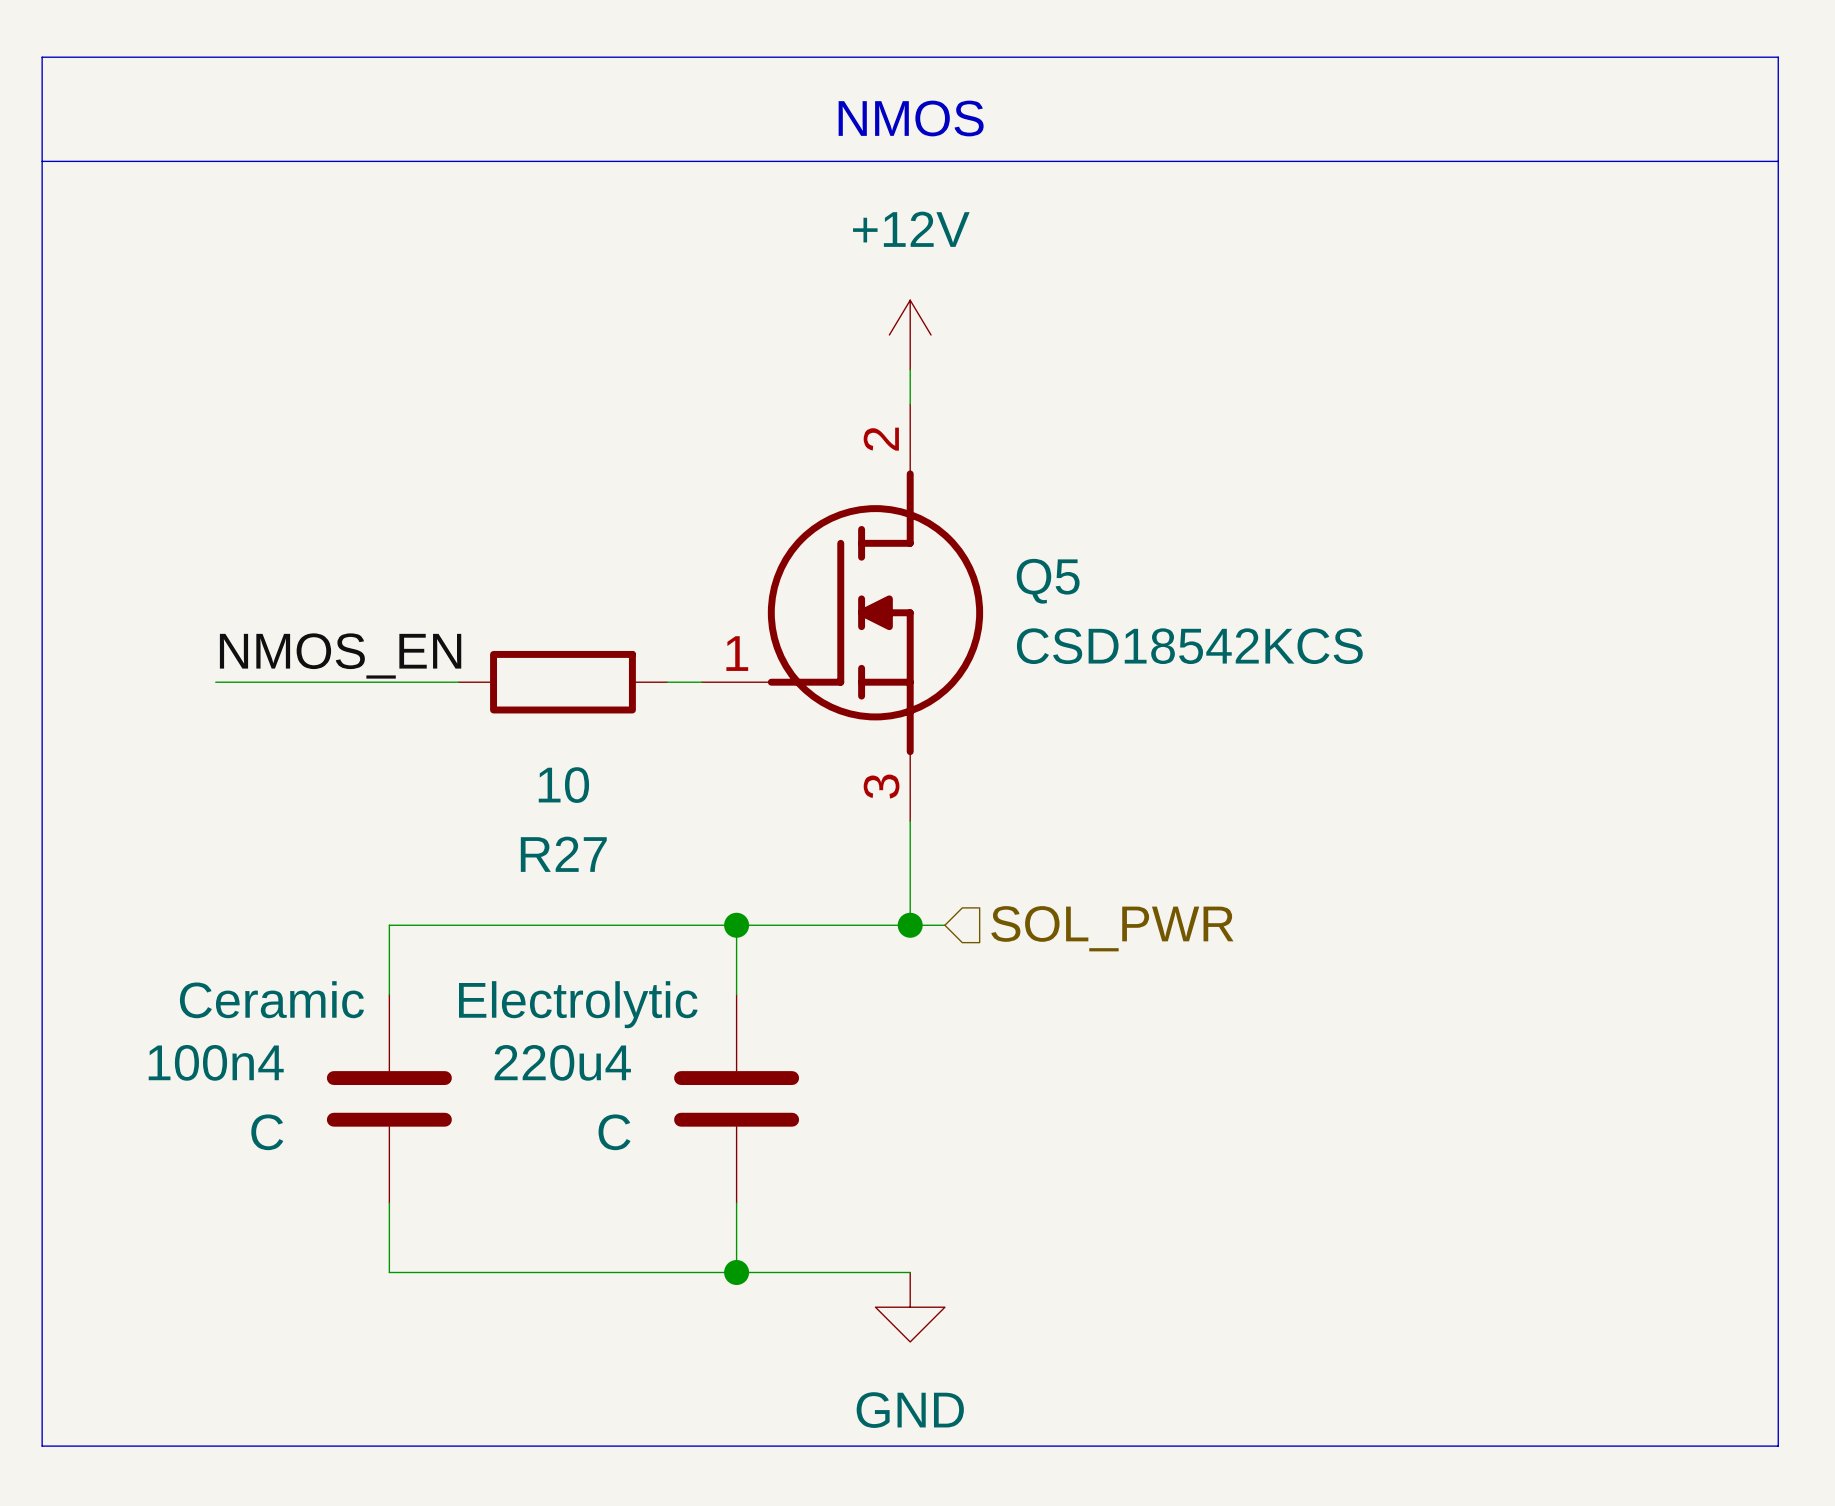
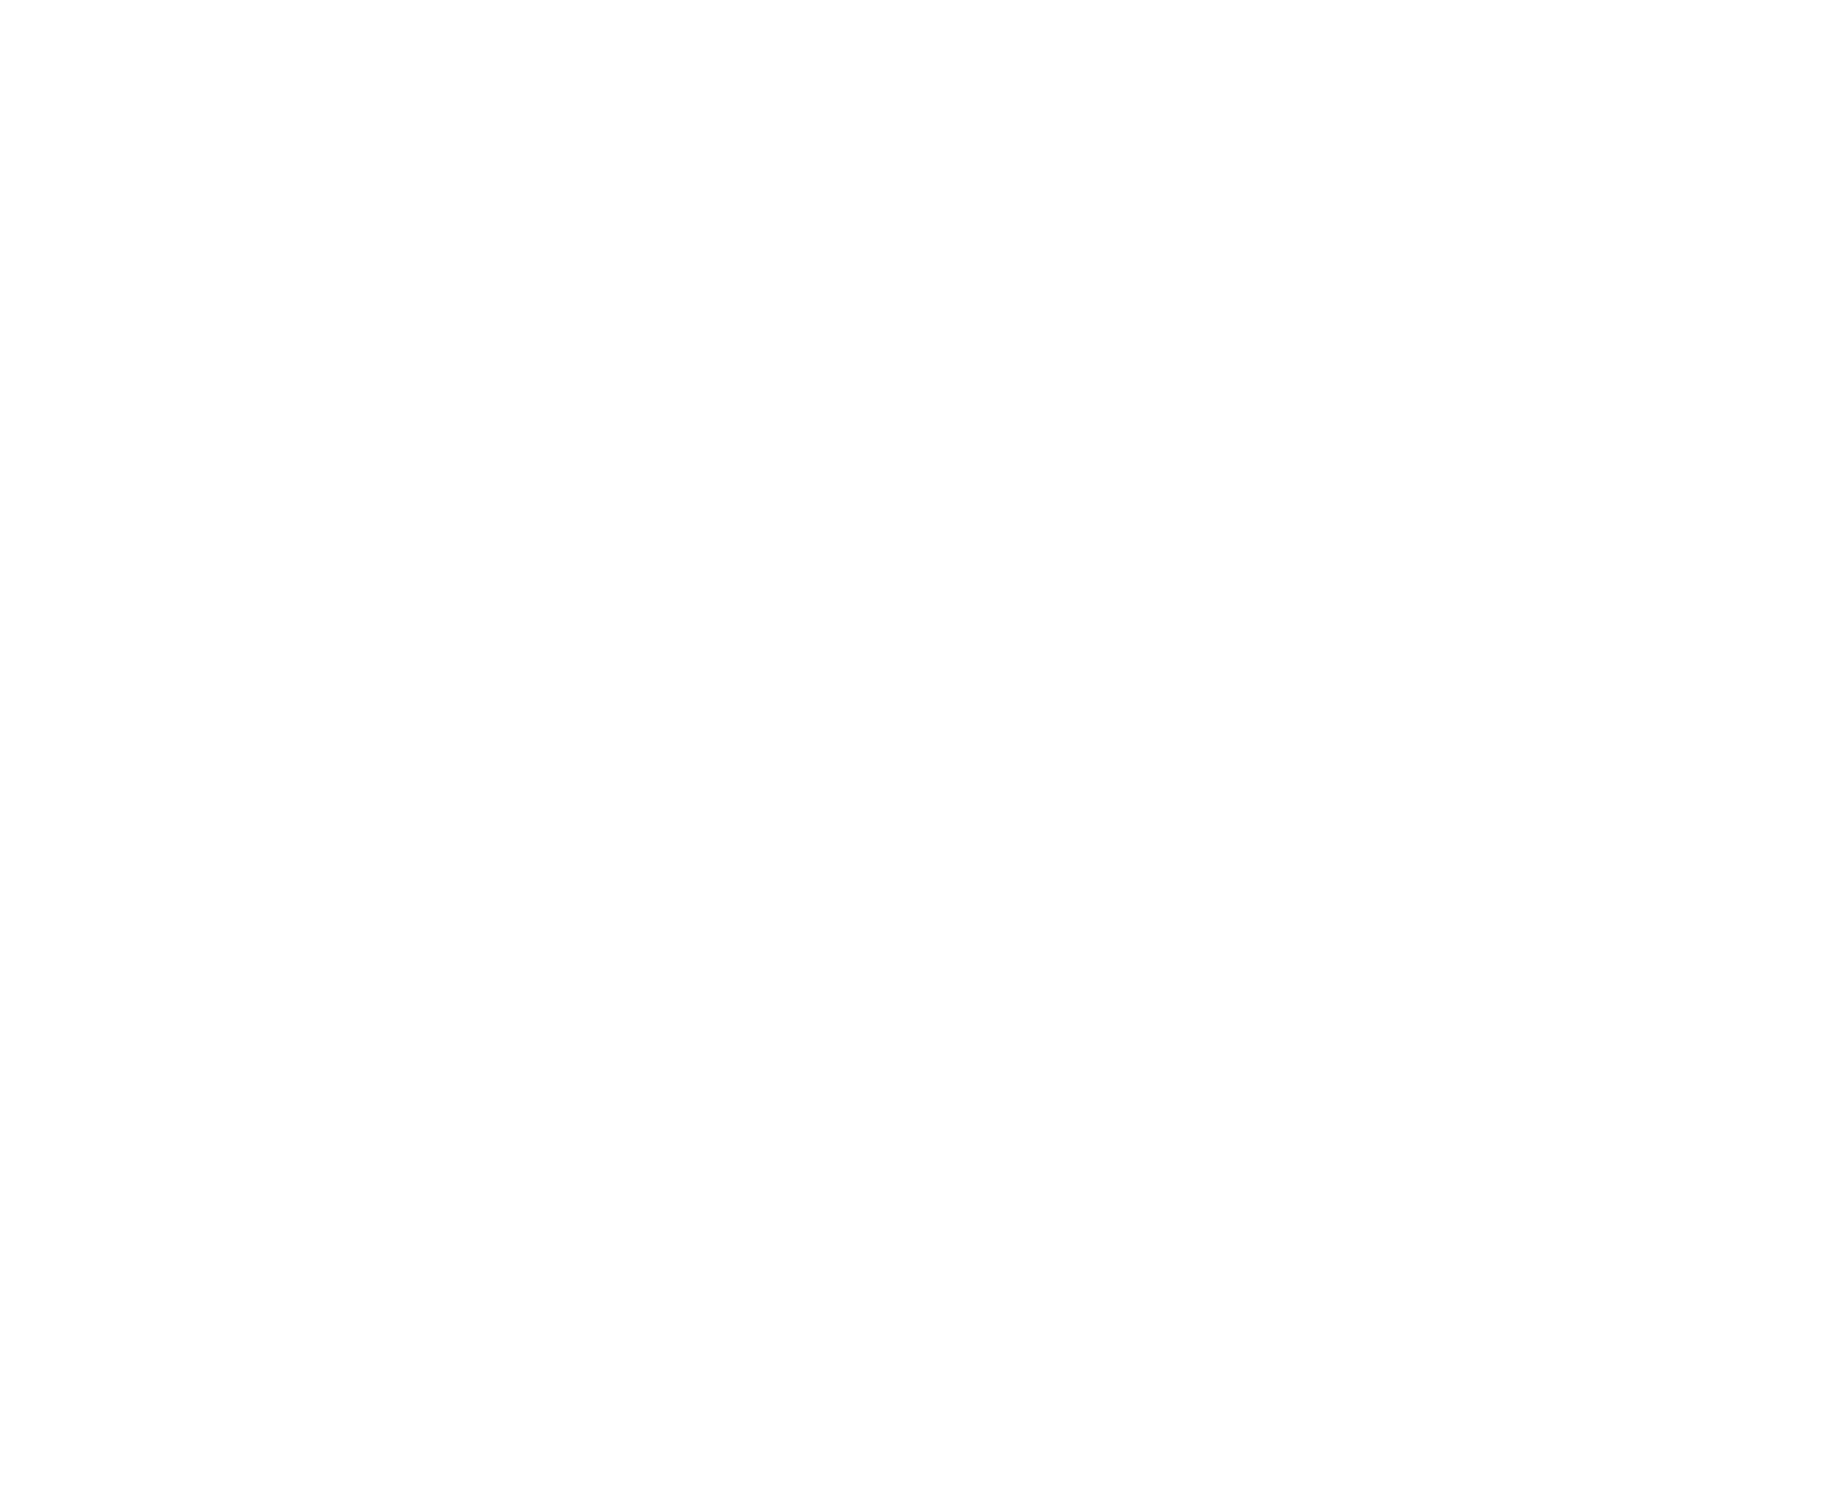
line: (42, 57) (1778, 57) (1778, 1446) (42, 1446) (42, 57) -> none
text: NMOS (911, 118) -> none
line: (42, 161) (1778, 161) -> none
power symbol: +12V (910, 334) -> none
wire: (910, 369) (910, 404) -> none
Q5: CSD18542KCS (842, 612) -> none
label: NMOS_EN (340, 655) -> none
wire: (215, 682) (458, 682) -> none
R27: 10 (562, 682) -> none
wire: (667, 682) (701, 682) -> none
wire: (910, 821) (910, 925) -> none
wire: (736, 925) (736, 994) -> none
junction: (736, 925) -> none
junction: (910, 925) -> none
wire: (944, 925) (389, 925) (389, 994) -> none
hierarchical label: SOL_PWR (1112, 928) -> none
100n4: C (389, 1098) -> none
220u4: C (736, 1098) -> none
wire: (389, 1203) (389, 1272) (910, 1272) -> none
wire: (736, 1203) (736, 1272) -> none
junction: (736, 1272) -> none
power symbol: GND (910, 1307) -> none

